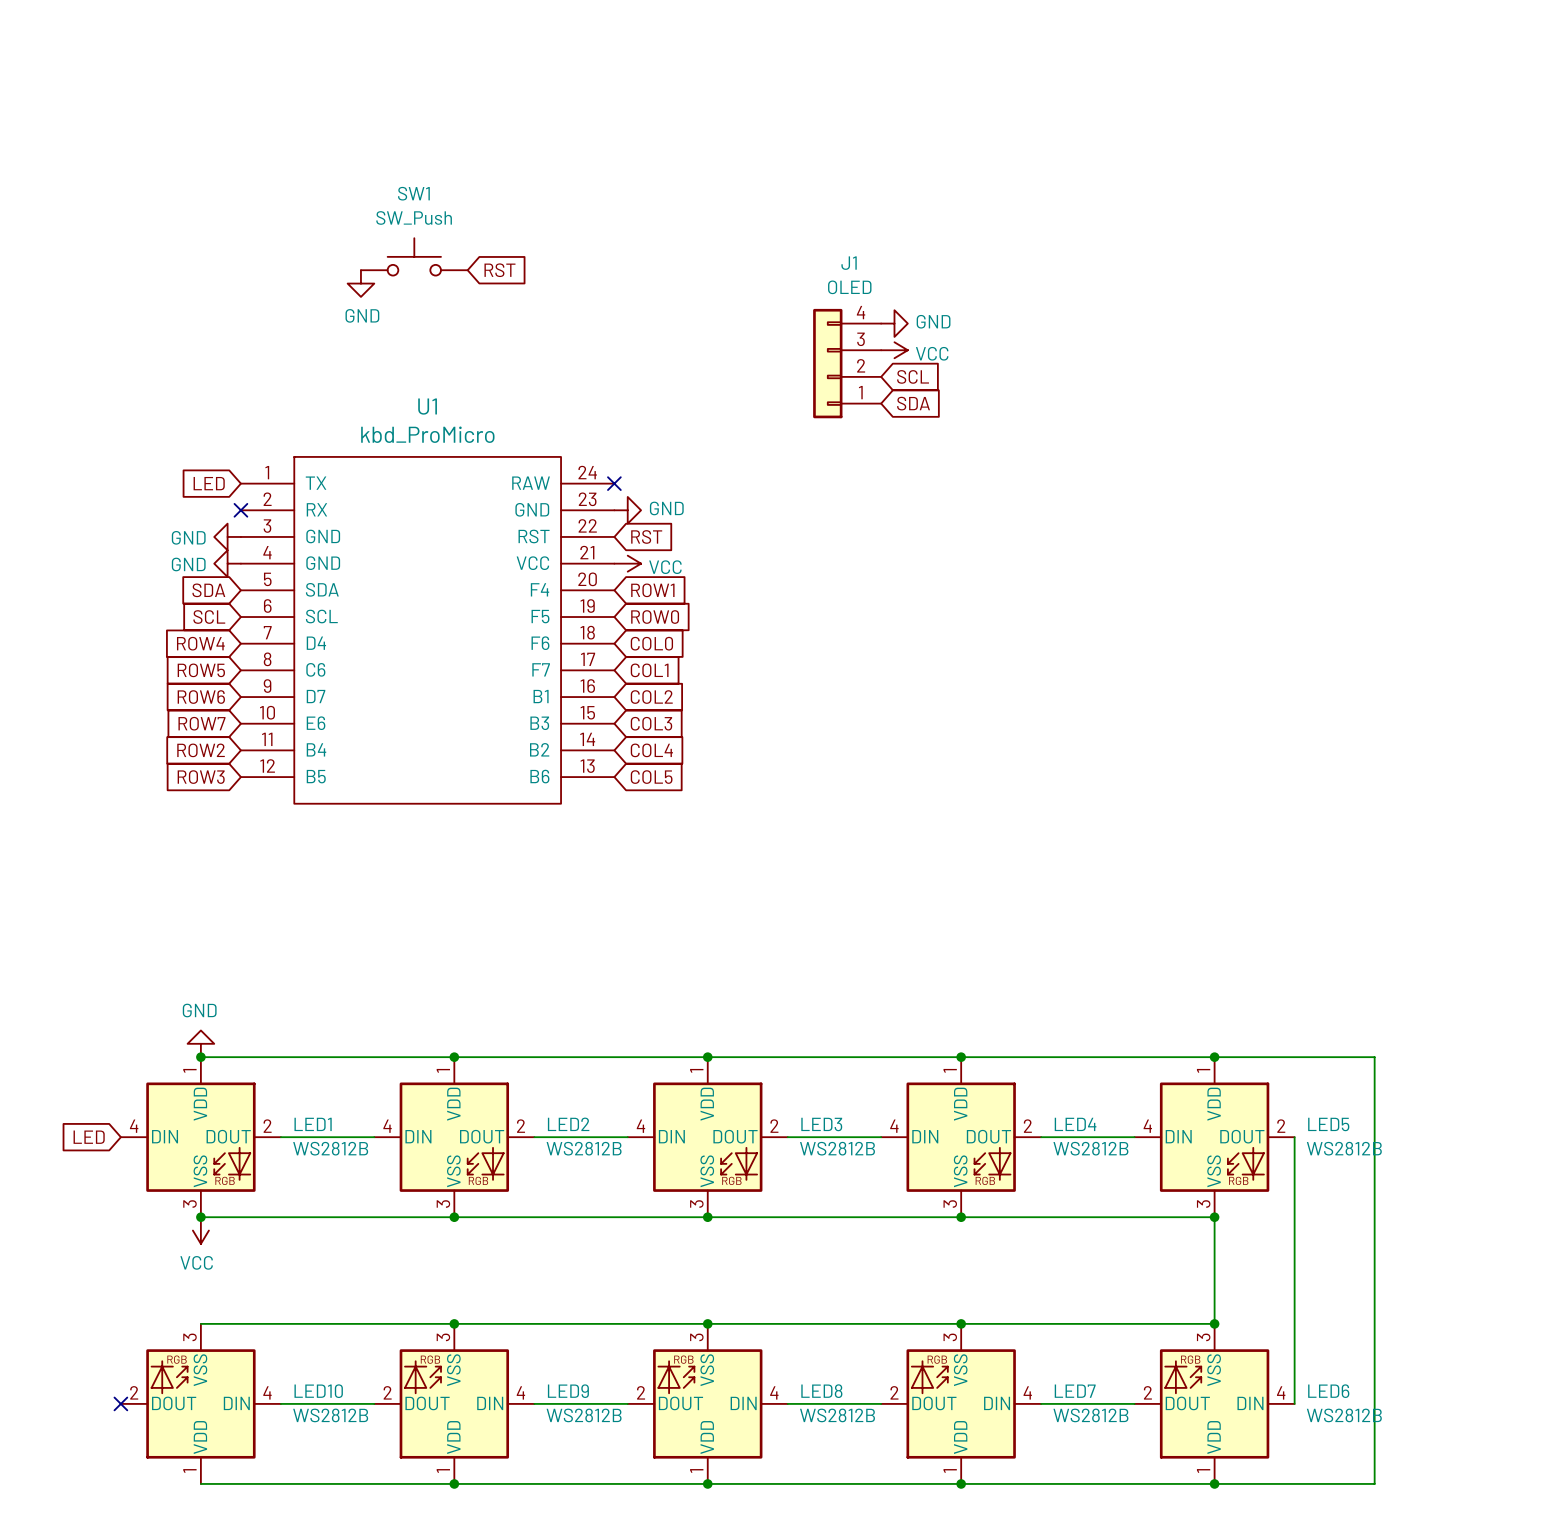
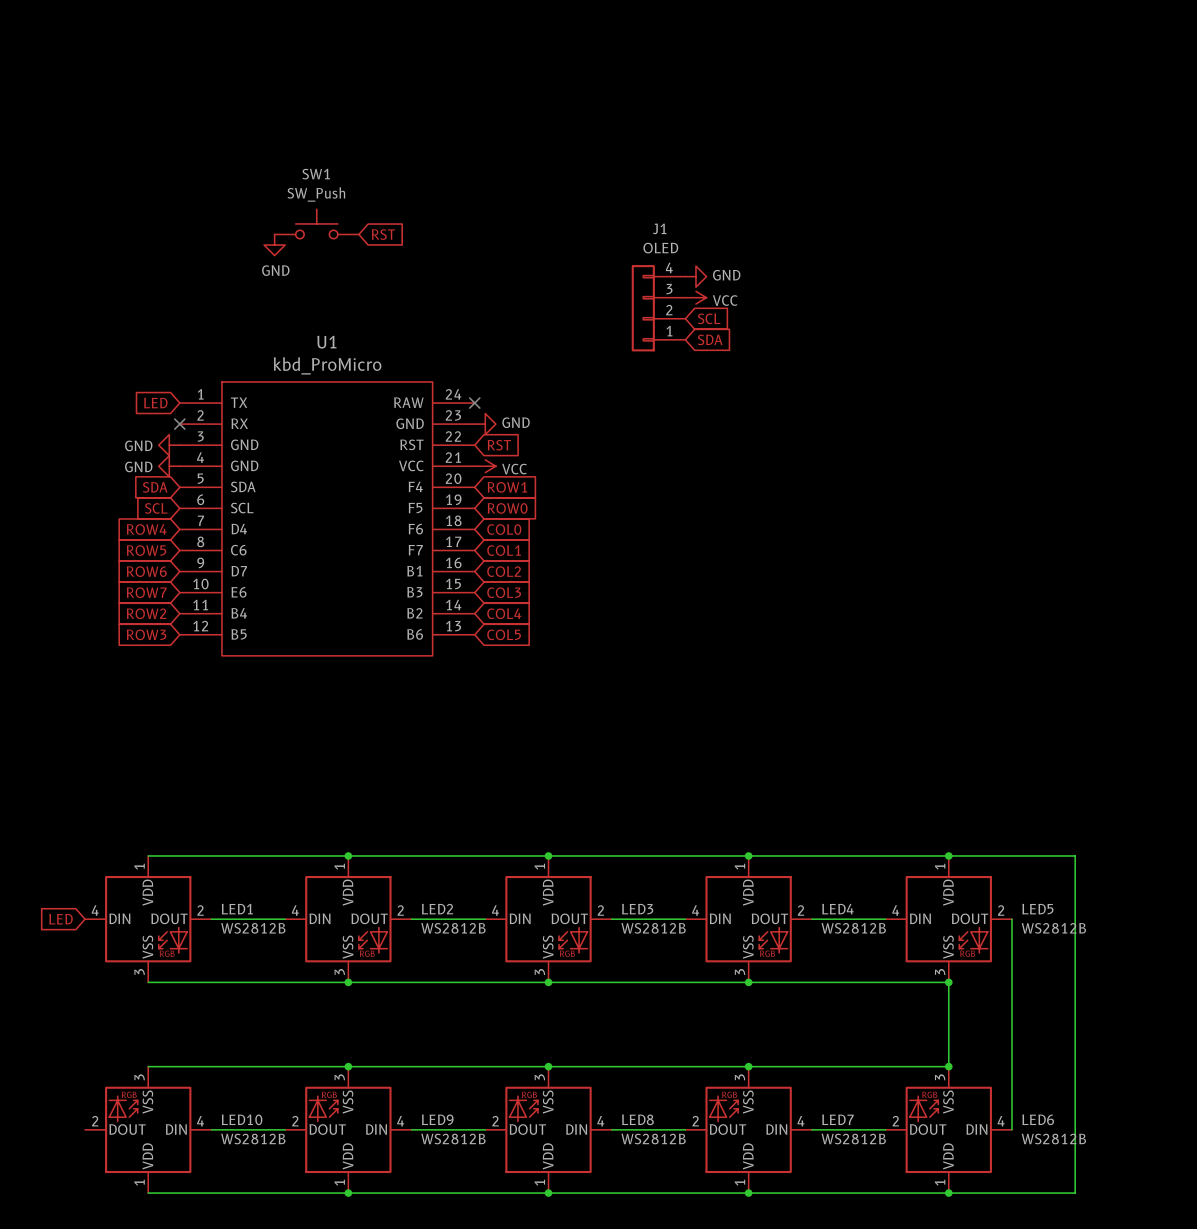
power symbol: GND (200, 1043) -> none
junction: (200, 1057) -> none
junction: (200, 1217) -> none
power symbol: VCC (200, 1230) -> none
no-connect mark: (120, 1403) -> none

